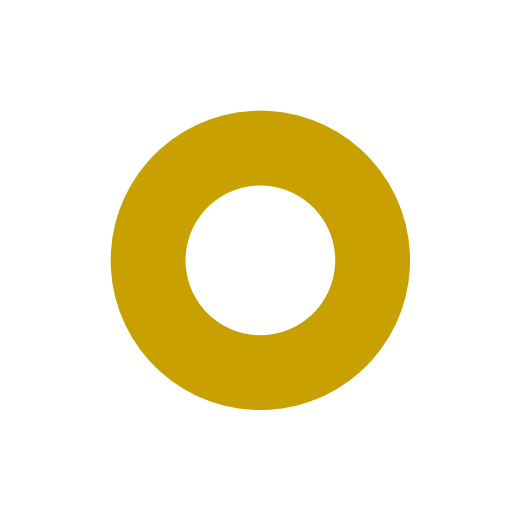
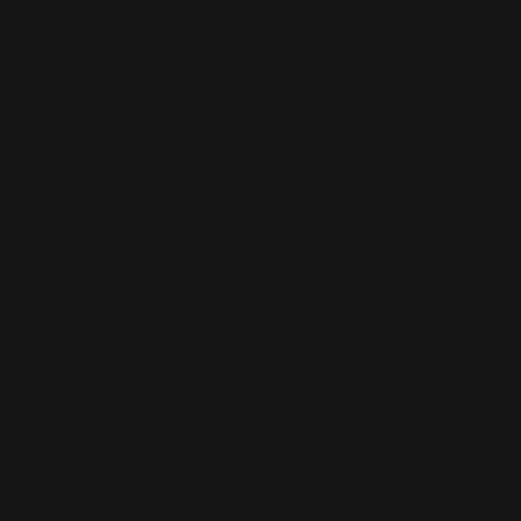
part: (260, 260) -> none

